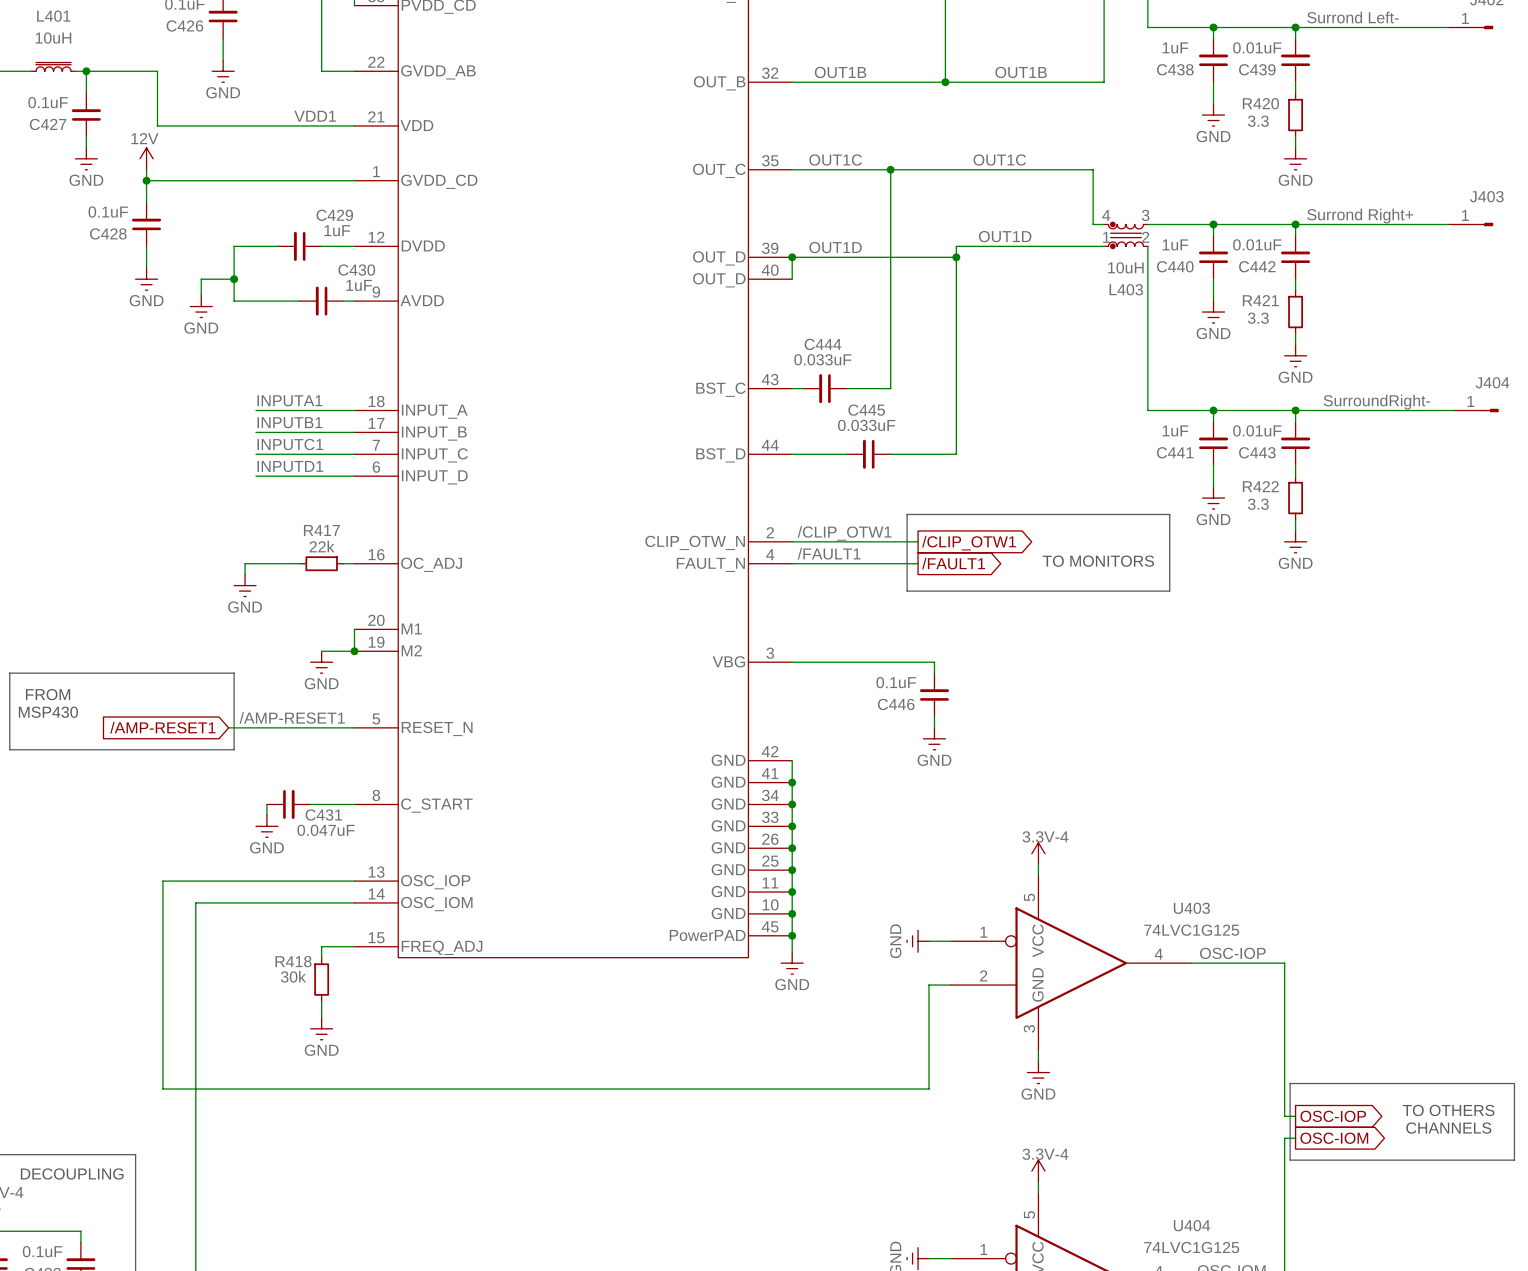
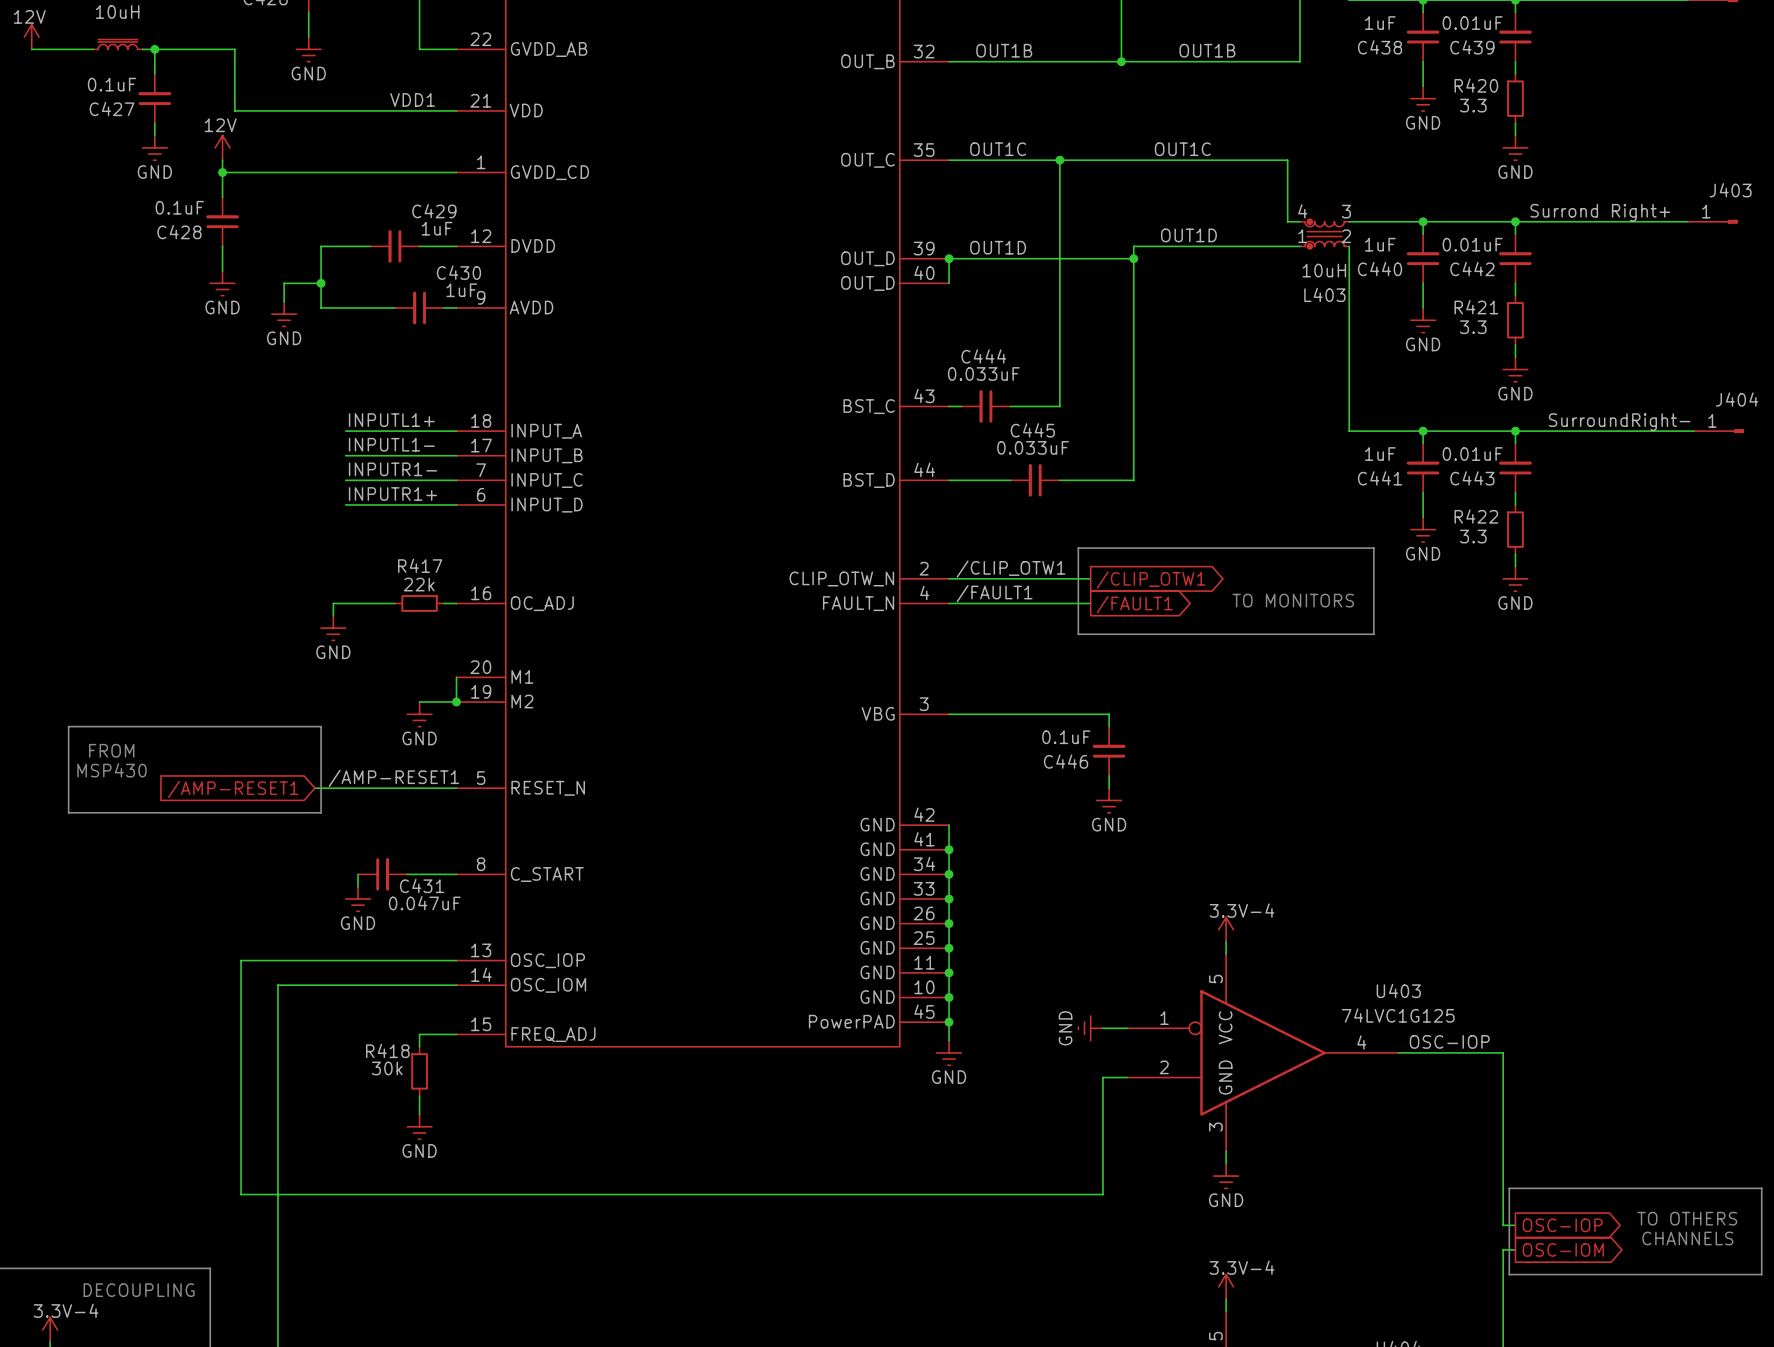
label: INPUTA1 (289, 400) -> INPUTL1+ (391, 420)
label: INPUTB1 (289, 422) -> INPUTL1- (391, 444)
label: INPUTC1 (290, 444) -> INPUTR1- (392, 469)
label: INPUTD1 (290, 466) -> INPUTR1+ (392, 493)

